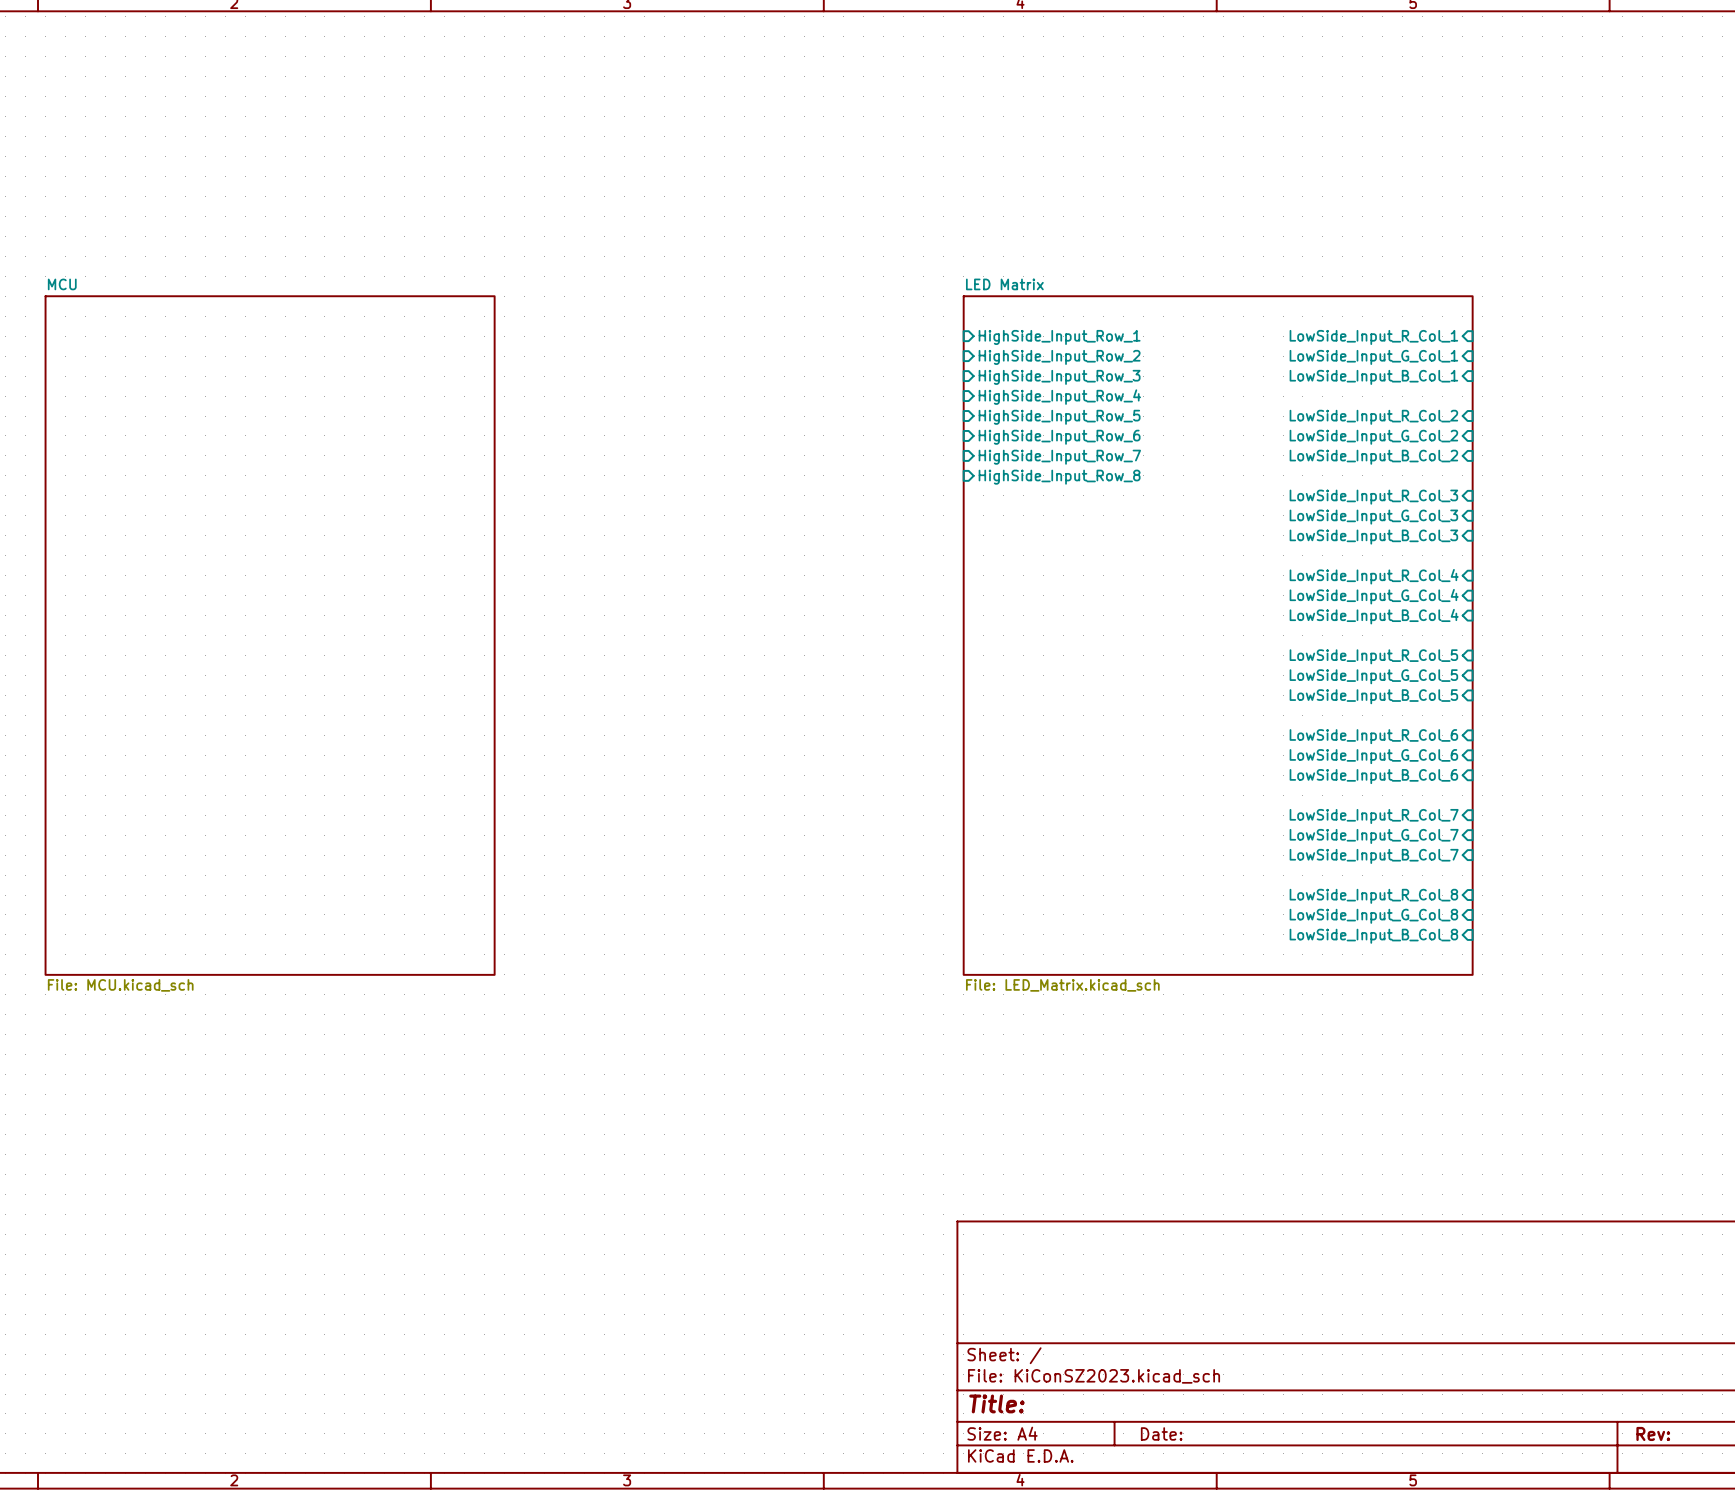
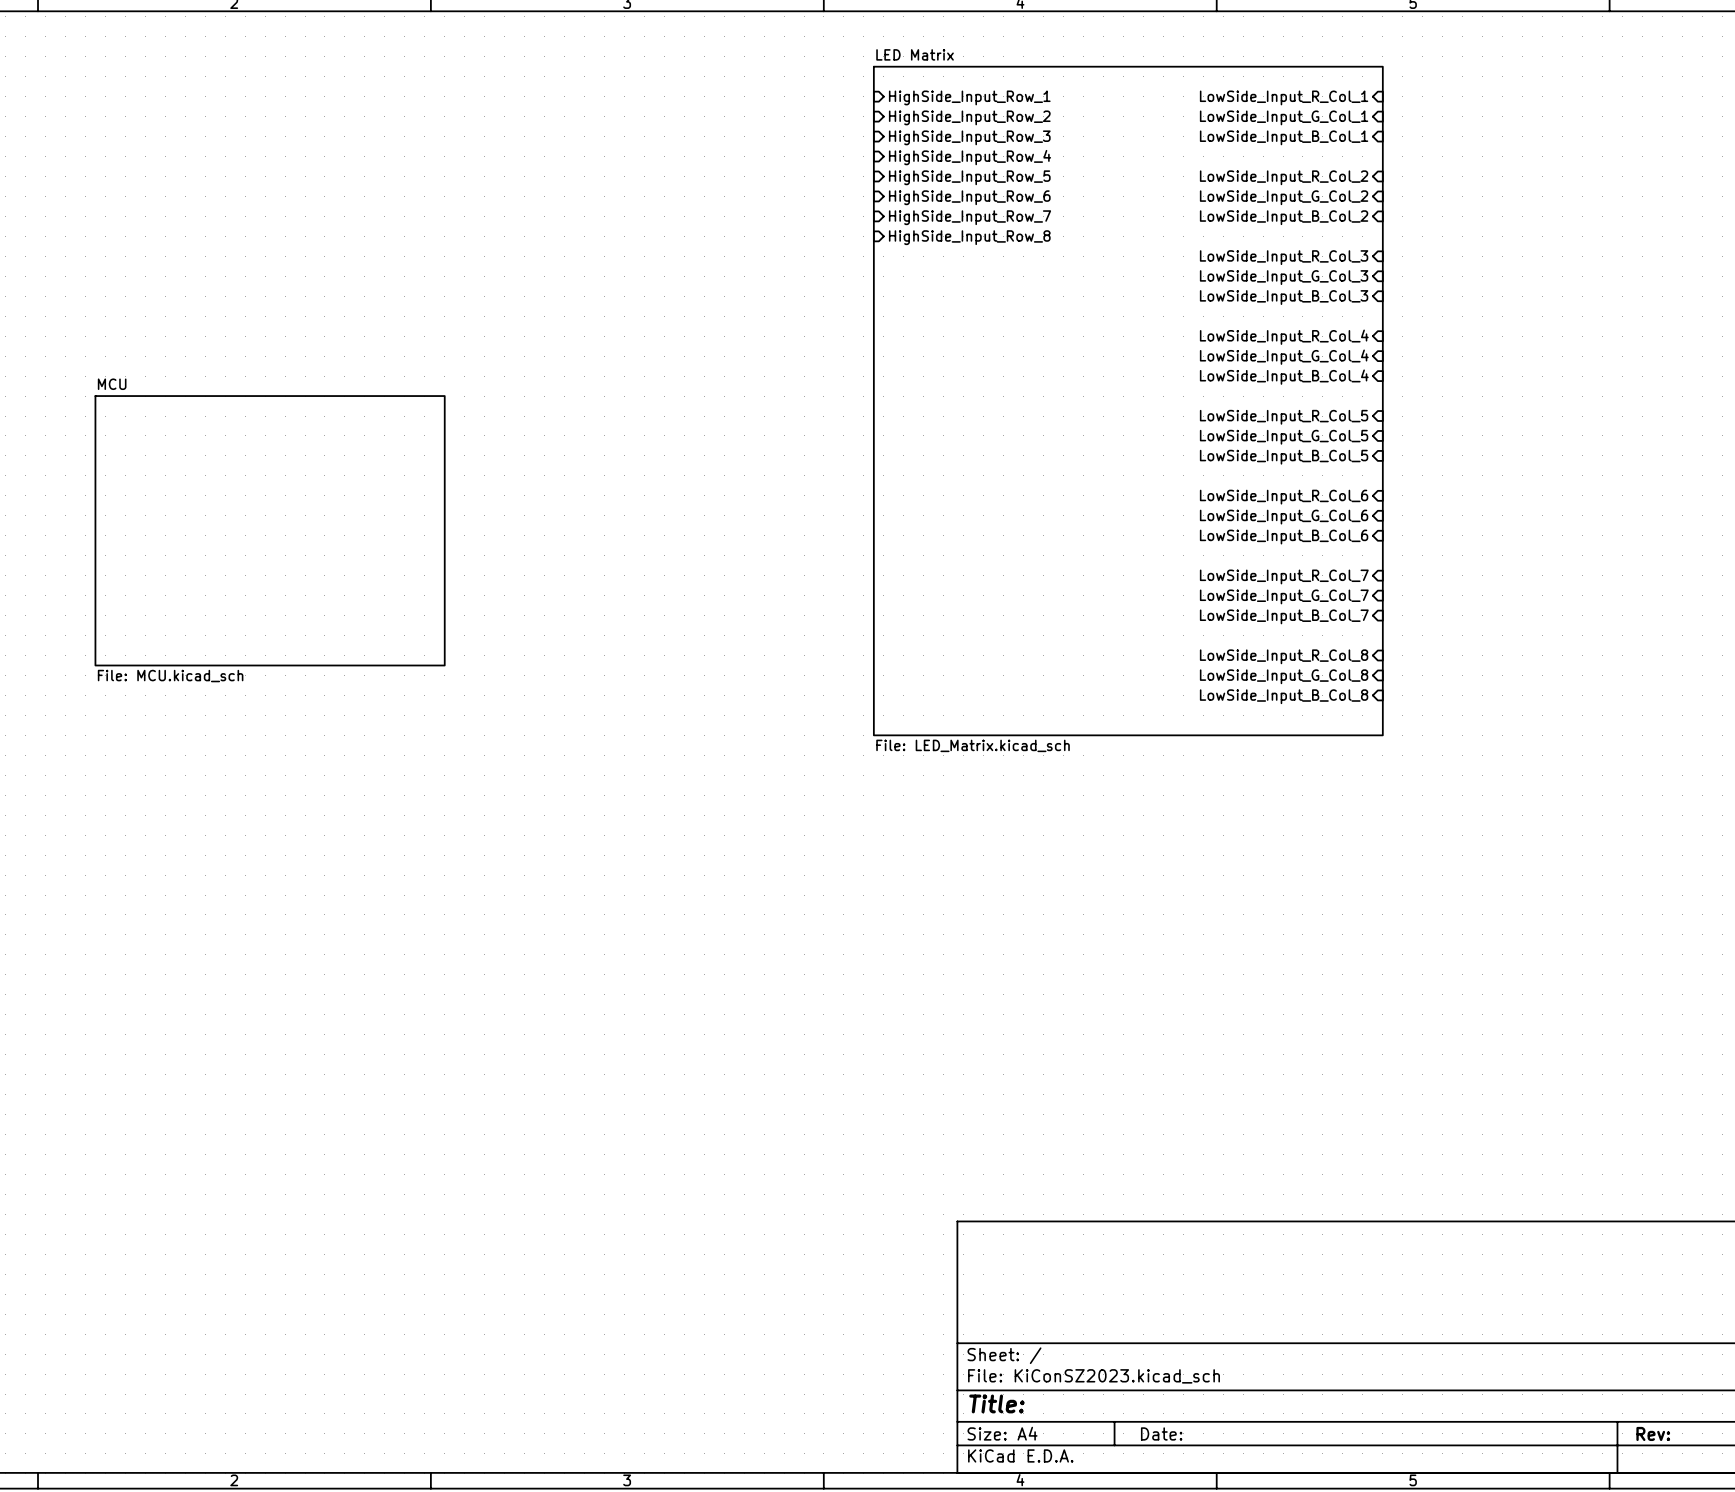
sheet pin: none -> HighSide_Input_Row_1 (969, 97)
sheet pin: none -> LowSide_Input_R_Col_1 (1284, 97)
sheet pin: none -> HighSide_Input_Row_2 (969, 117)
sheet pin: none -> LowSide_Input_G_Col_1 (1284, 117)
sheet pin: none -> HighSide_Input_Row_3 (969, 137)
sheet pin: none -> LowSide_Input_B_Col_1 (1284, 137)
sheet pin: none -> HighSide_Input_Row_4 (970, 157)
sheet pin: none -> HighSide_Input_Row_5 (969, 177)
sheet pin: none -> LowSide_Input_R_Col_2 (1284, 177)
sheet pin: none -> HighSide_Input_Row_6 (969, 197)
sheet pin: none -> LowSide_Input_G_Col_2 (1284, 197)
sheet pin: none -> HighSide_Input_Row_7 (970, 217)
sheet pin: none -> LowSide_Input_B_Col_2 (1284, 217)
sheet pin: none -> HighSide_Input_Row_8 (969, 237)
sheet pin: none -> LowSide_Input_R_Col_3 (1284, 257)
sheet pin: none -> LowSide_Input_G_Col_3 (1284, 277)
sheet pin: none -> LowSide_Input_B_Col_3 (1284, 297)
sheet pin: HighSide_Input_Row_1 (1059, 337) -> none
sheet pin: none -> LowSide_Input_R_Col_4 (1284, 337)
sheet pin: LowSide_Input_R_Col_1 (1373, 337) -> none
sheet pin: HighSide_Input_Row_2 (1059, 357) -> none
sheet pin: none -> LowSide_Input_G_Col_4 (1284, 357)
sheet pin: LowSide_Input_G_Col_1 (1373, 357) -> none
sheet pin: HighSide_Input_Row_3 (1059, 377) -> none
sheet pin: none -> LowSide_Input_B_Col_4 (1284, 377)
sheet pin: LowSide_Input_B_Col_1 (1373, 377) -> none
sheet pin: HighSide_Input_Row_4 (1059, 397) -> none
sheet LED Matrix: none -> File: LED_Matrix.kicad_sch (1128, 401)
sheet pin: HighSide_Input_Row_5 (1059, 417) -> none
sheet pin: none -> LowSide_Input_R_Col_5 (1284, 417)
sheet pin: LowSide_Input_R_Col_2 (1373, 417) -> none
sheet pin: HighSide_Input_Row_6 (1059, 437) -> none
sheet pin: none -> LowSide_Input_G_Col_5 (1284, 437)
sheet pin: LowSide_Input_G_Col_2 (1373, 437) -> none
sheet pin: HighSide_Input_Row_7 (1059, 457) -> none
sheet pin: none -> LowSide_Input_B_Col_5 (1284, 457)
sheet pin: LowSide_Input_B_Col_2 (1373, 457) -> none
sheet pin: HighSide_Input_Row_8 (1059, 477) -> none
sheet pin: none -> LowSide_Input_R_Col_6 (1284, 497)
sheet pin: LowSide_Input_R_Col_3 (1373, 497) -> none
sheet pin: none -> LowSide_Input_G_Col_6 (1284, 517)
sheet pin: LowSide_Input_G_Col_3 (1373, 517) -> none
sheet MCU: none -> File: MCU.kicad_sch (270, 530)
sheet pin: none -> LowSide_Input_B_Col_6 (1284, 537)
sheet pin: LowSide_Input_B_Col_3 (1373, 537) -> none
sheet pin: none -> LowSide_Input_R_Col_7 (1284, 576)
sheet pin: LowSide_Input_R_Col_4 (1374, 576) -> none
sheet pin: none -> LowSide_Input_G_Col_7 (1284, 596)
sheet pin: LowSide_Input_G_Col_4 (1374, 596) -> none
sheet pin: none -> LowSide_Input_B_Col_7 (1284, 616)
sheet pin: LowSide_Input_B_Col_4 (1374, 616) -> none
sheet MCU: File: MCU.kicad_sch (270, 635) -> none
sheet LED Matrix: File: LED_Matrix.kicad_sch (1218, 635) -> none
sheet pin: none -> LowSide_Input_R_Col_8 (1284, 656)
sheet pin: LowSide_Input_R_Col_5 (1373, 656) -> none
sheet pin: none -> LowSide_Input_G_Col_8 (1284, 676)
sheet pin: LowSide_Input_G_Col_5 (1373, 676) -> none
sheet pin: none -> LowSide_Input_B_Col_8 (1284, 696)
sheet pin: LowSide_Input_B_Col_5 (1373, 696) -> none
sheet pin: LowSide_Input_R_Col_6 (1373, 736) -> none
sheet pin: LowSide_Input_G_Col_6 (1373, 756) -> none
sheet pin: LowSide_Input_B_Col_6 (1373, 776) -> none
sheet pin: LowSide_Input_R_Col_7 (1374, 816) -> none
sheet pin: LowSide_Input_G_Col_7 (1374, 836) -> none
sheet pin: LowSide_Input_B_Col_7 (1374, 856) -> none
sheet pin: LowSide_Input_R_Col_8 (1373, 896) -> none
sheet pin: LowSide_Input_G_Col_8 (1373, 916) -> none
sheet pin: LowSide_Input_B_Col_8 (1373, 936) -> none

